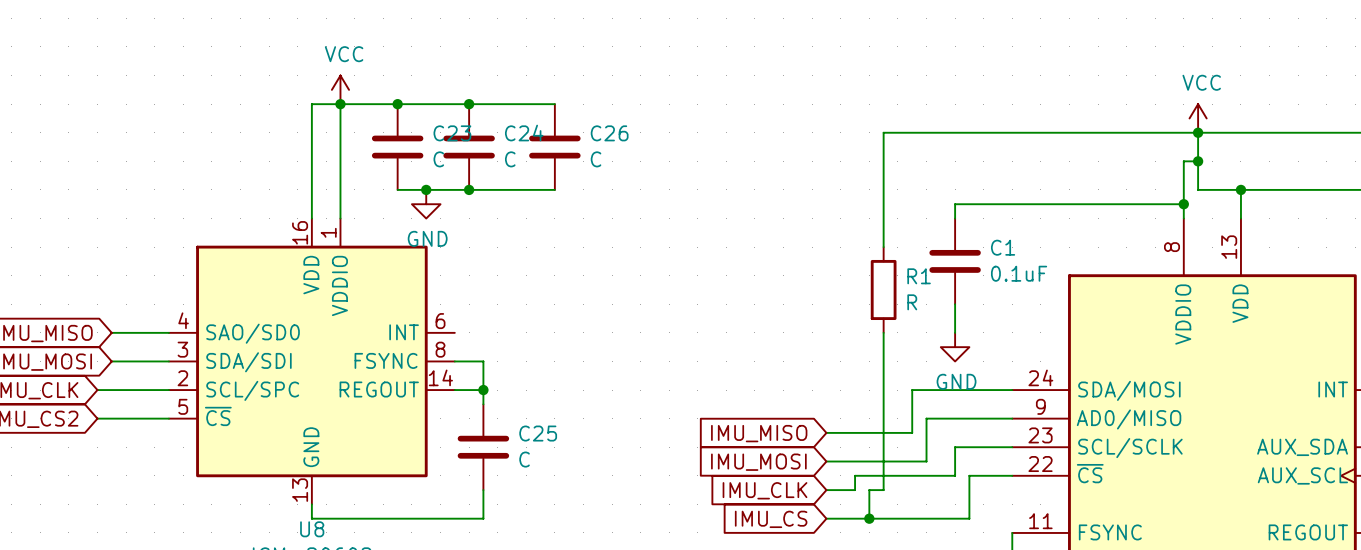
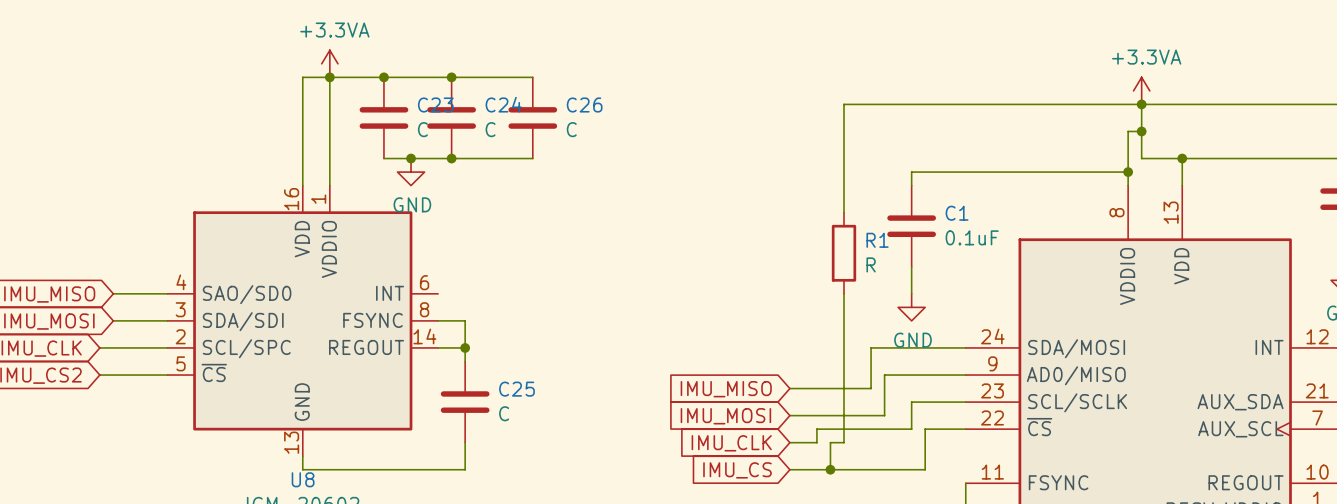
power symbol: VCC (340, 89) -> +3.3VA (329, 63)
power symbol: VCC (1198, 118) -> +3.3VA (1141, 90)

